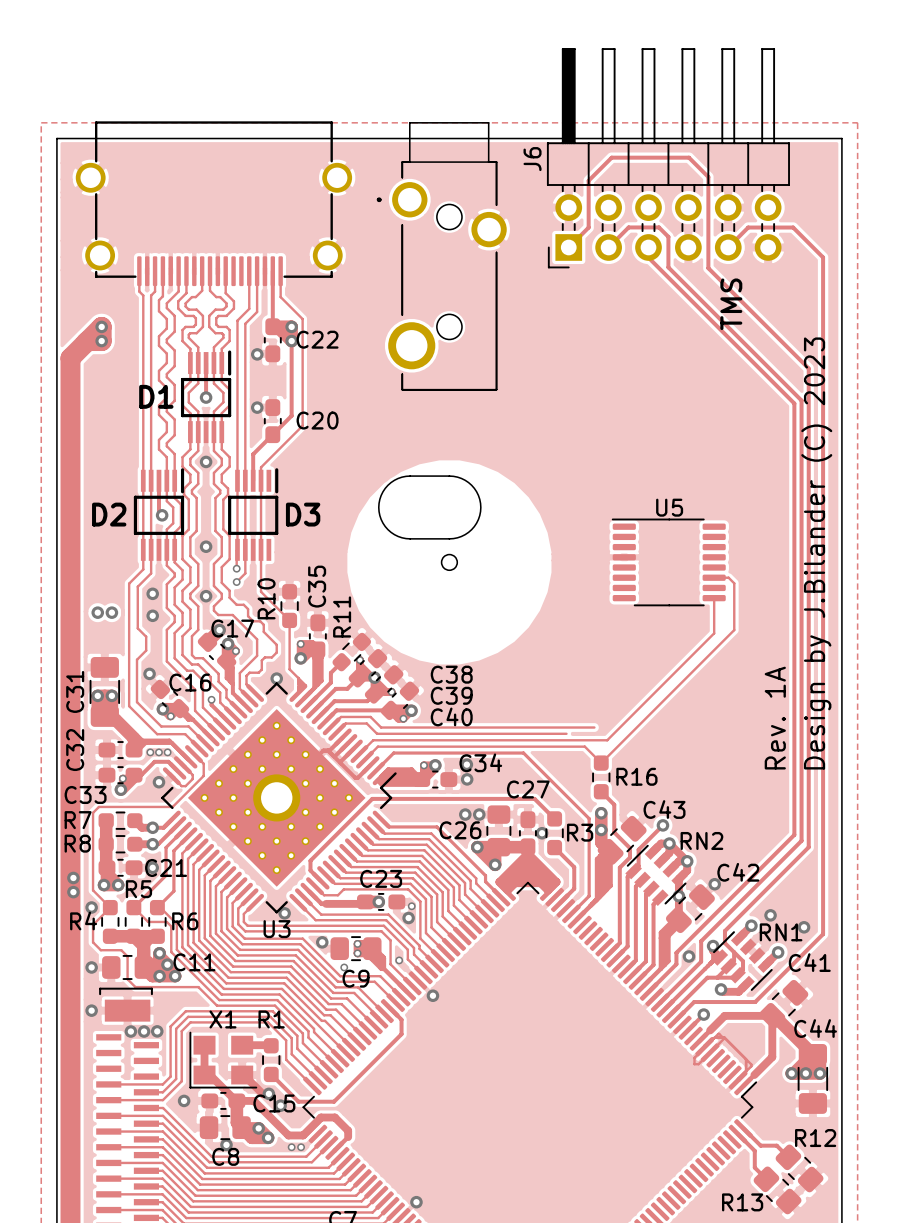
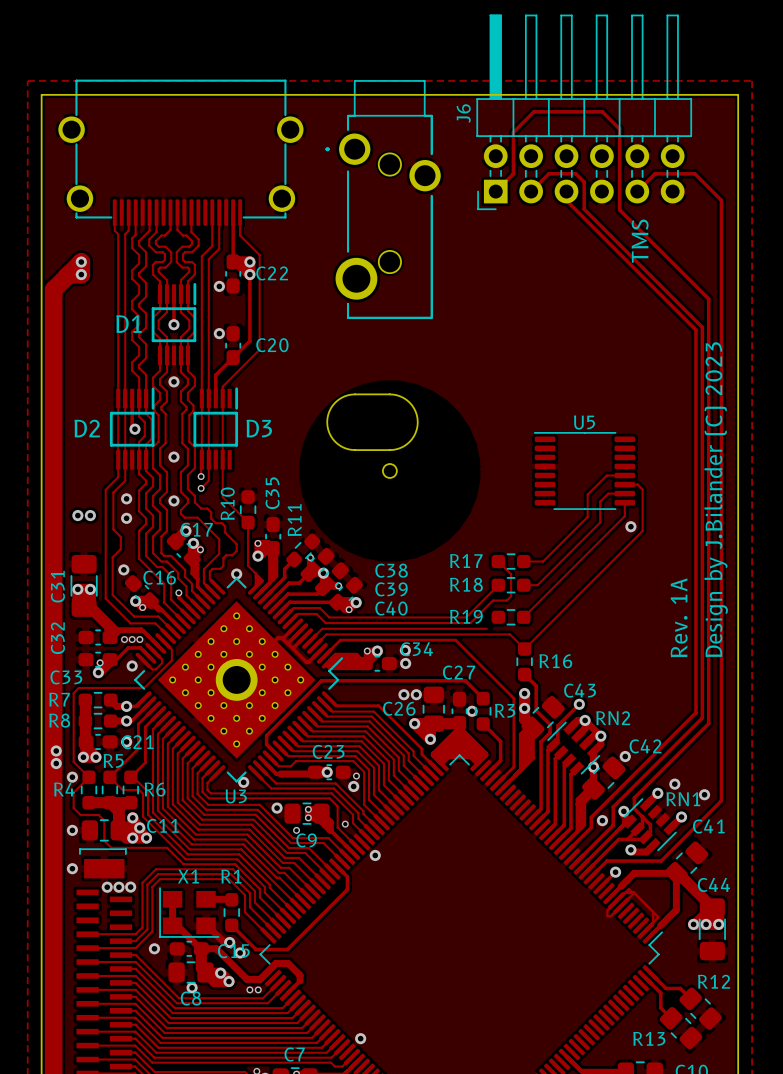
track: none -> (624, 475) (606, 475) (587, 494) (587, 516) (543, 561) (523, 561)
track: none -> (624, 493) (608, 493) (600, 501) (600, 522) (537, 585) (523, 585)
track: (714, 613) (714, 633) (607, 740) (558, 740) -> (624, 516) (523, 617)
via: none -> (630, 526)
R17: none -> (511, 561)
R18: none -> (511, 585)
track: (535, 727) (594, 727) -> (466, 617) (498, 585)
R19: none -> (511, 617)
track: (540, 733) (566, 733) -> (470, 623) (492, 600) (506, 600) (511, 596) (511, 574) (498, 561)

